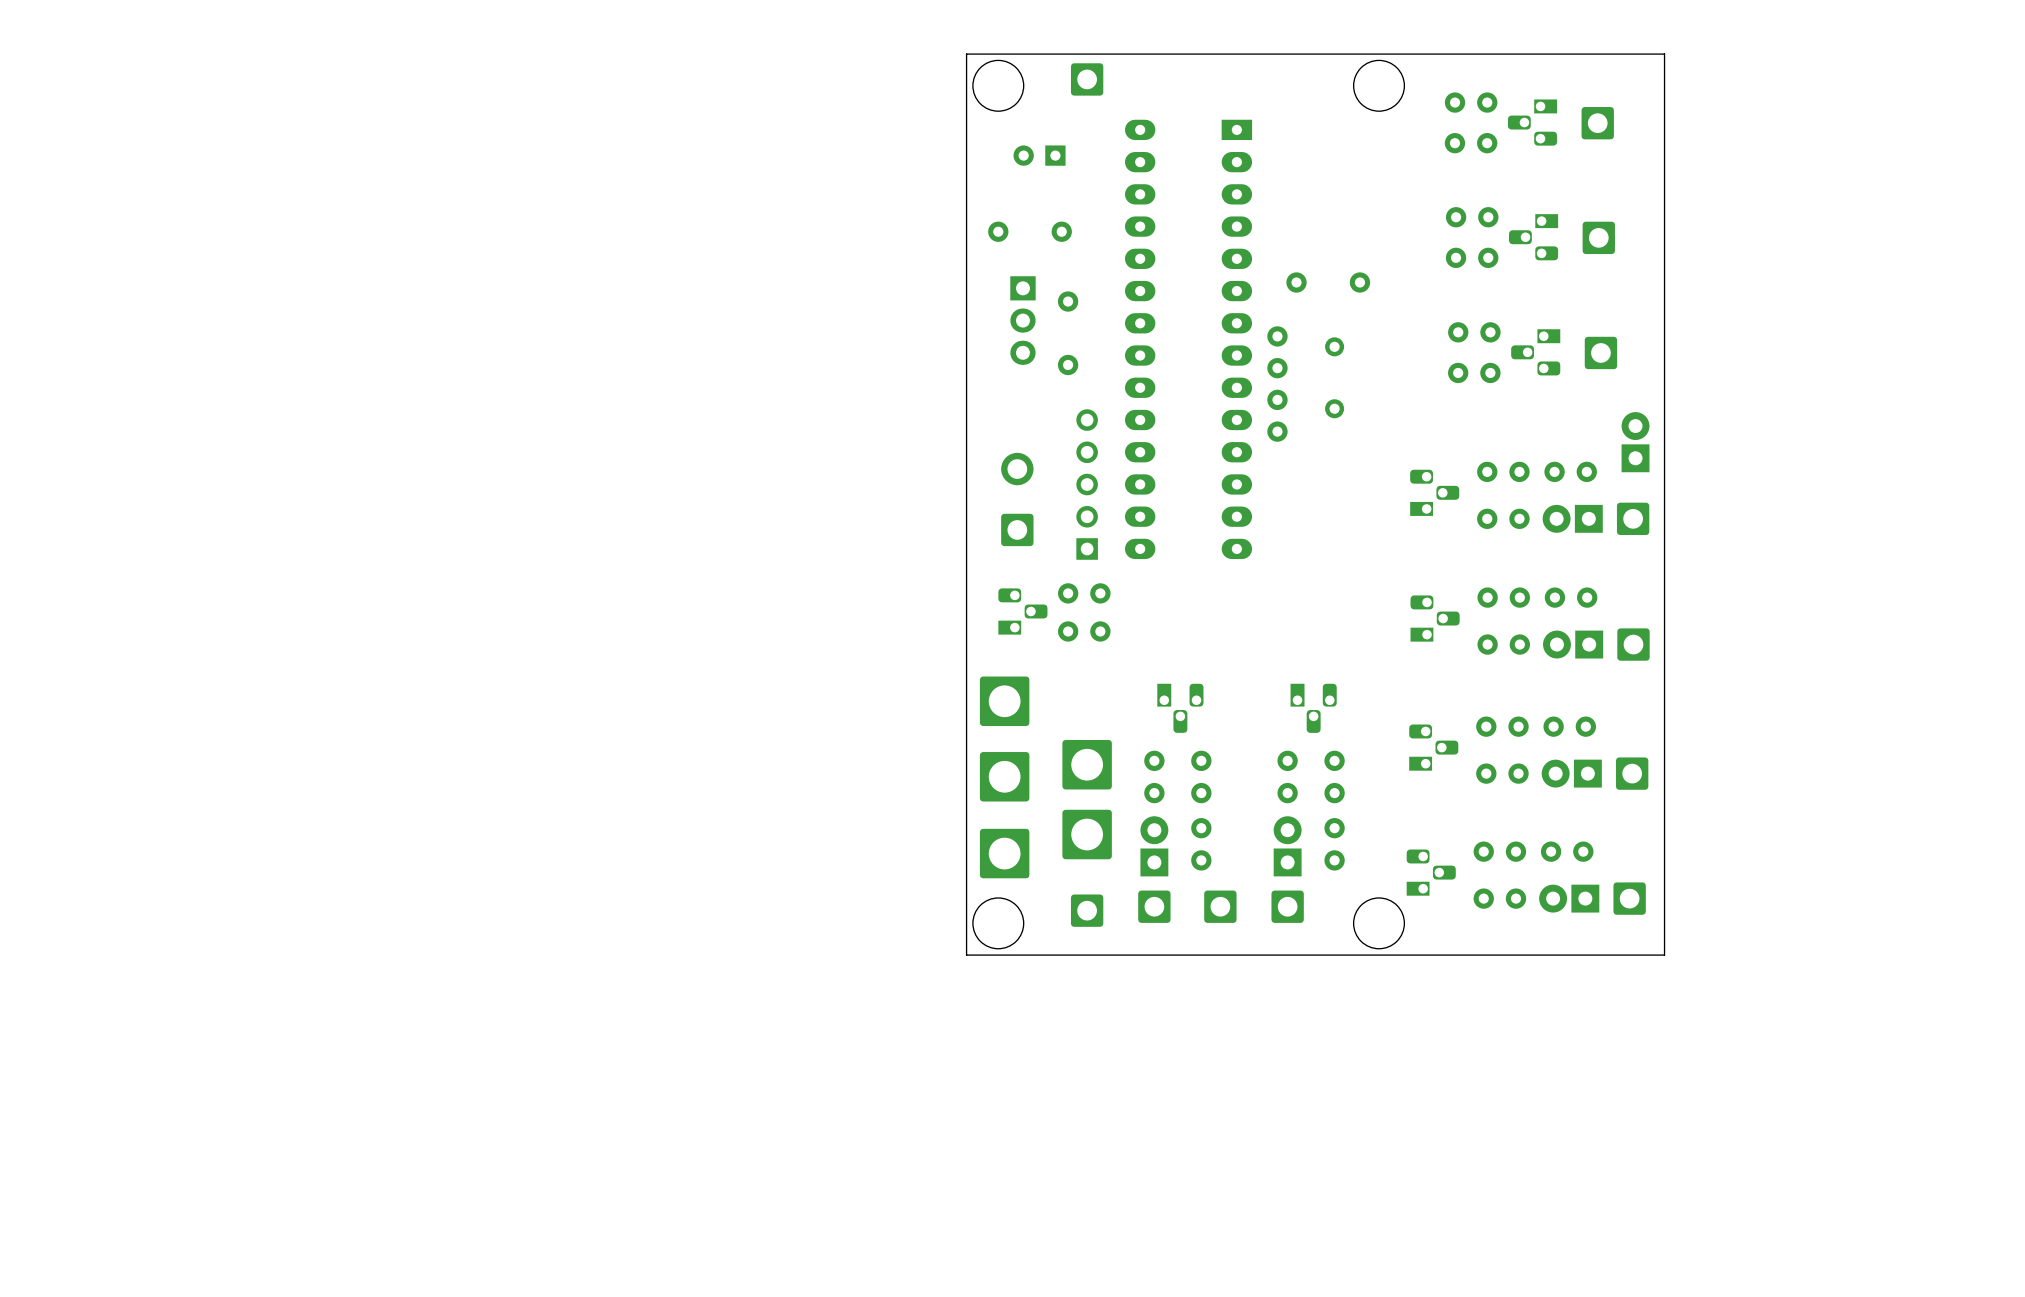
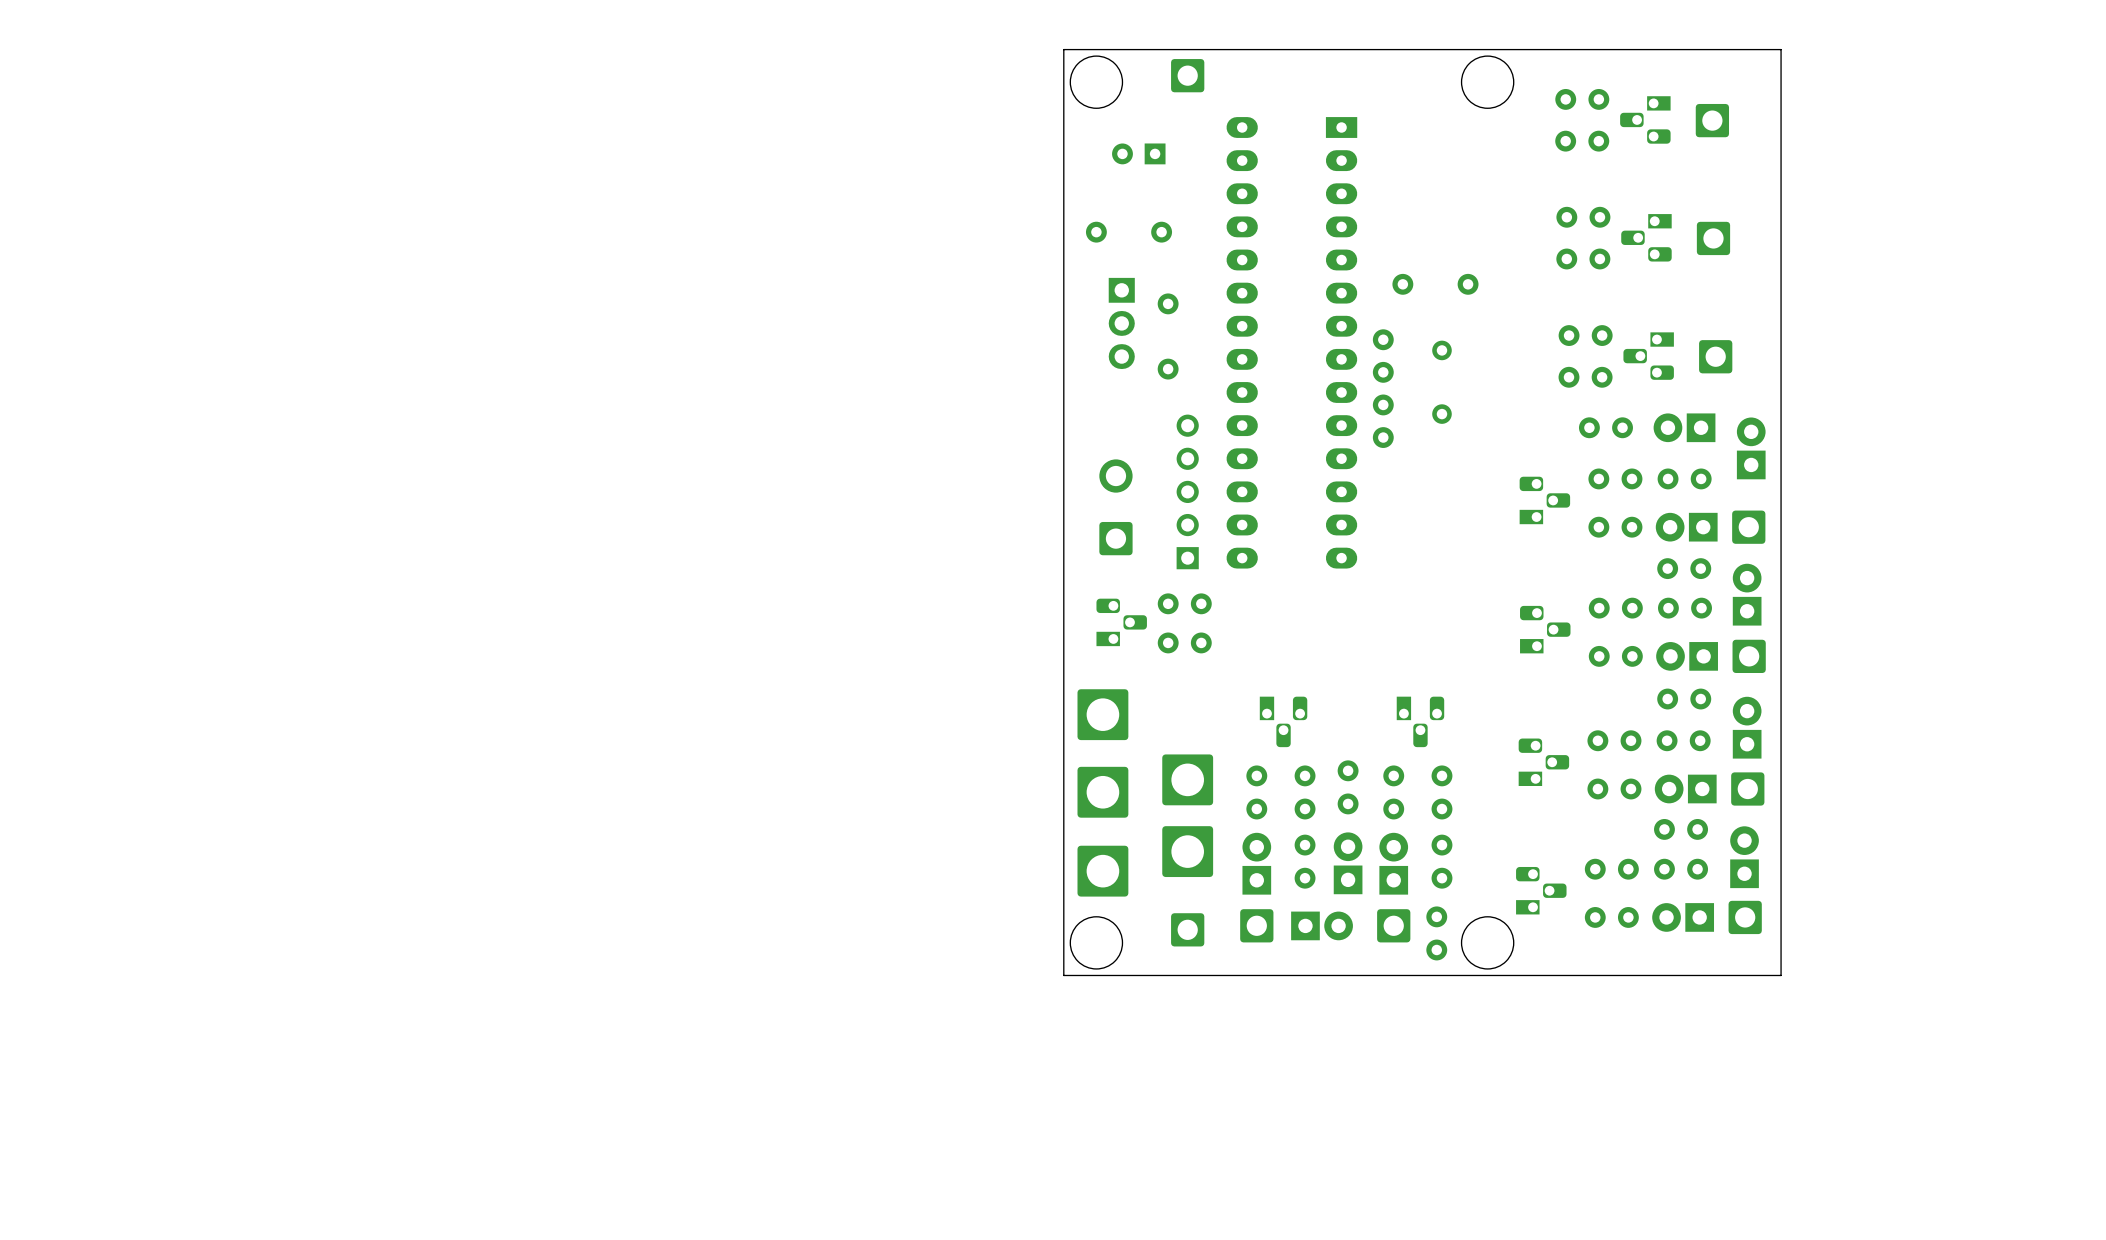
part: none -> (1605, 427)
part: none -> (1684, 427)
part: none -> (1684, 568)
part: none -> (1747, 594)
part: none -> (1684, 699)
part: none -> (1747, 727)
part: none -> (1348, 787)
part: none -> (1681, 829)
part: none -> (1744, 857)
part: none -> (1348, 863)
part footprint: [1204, 890, 1237, 923] -> [1291, 911, 1353, 941]
part: none -> (1436, 933)

